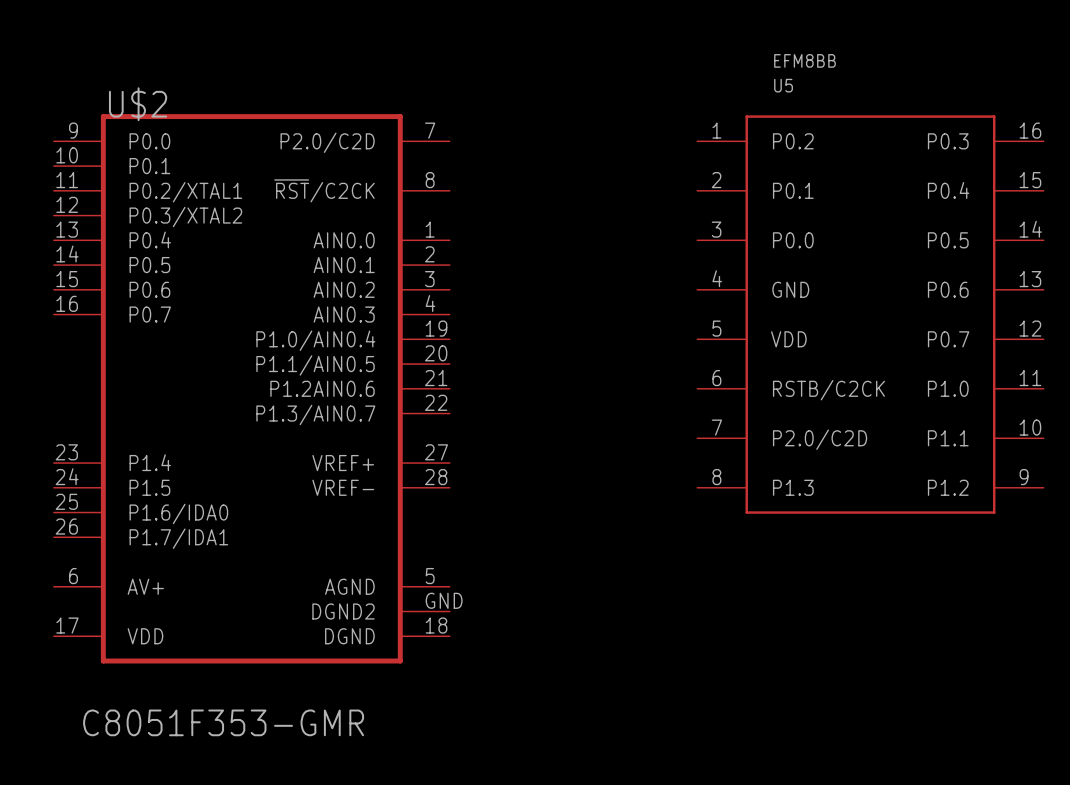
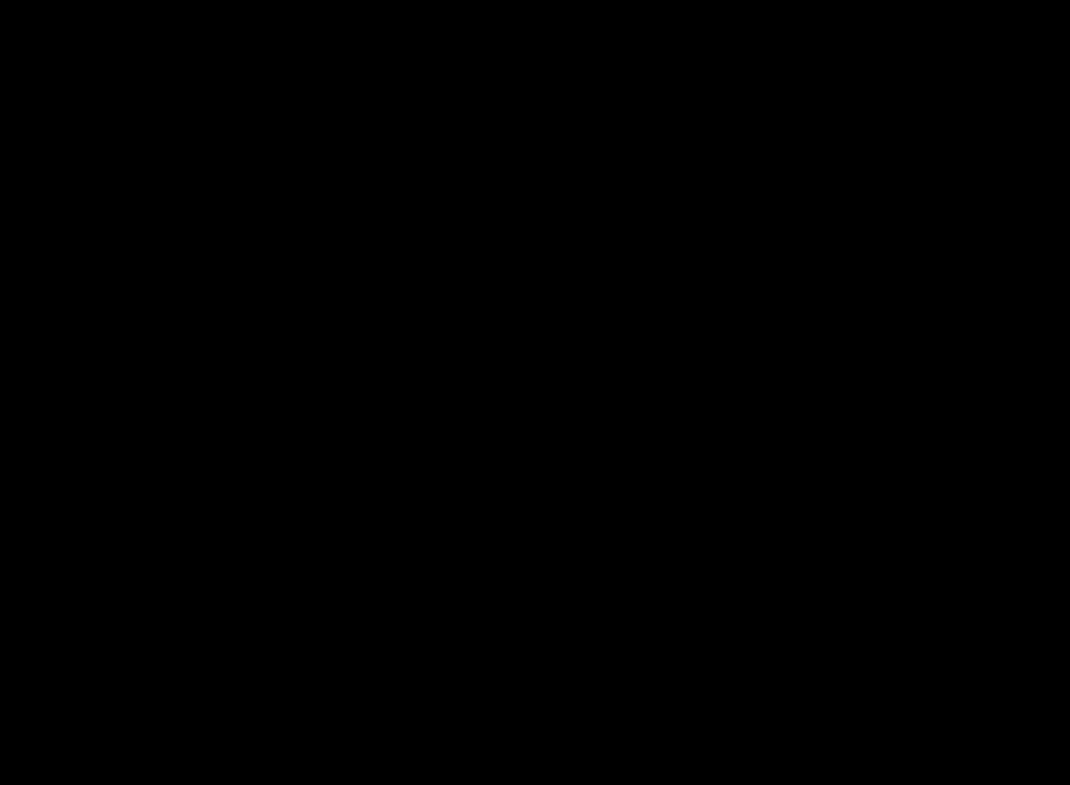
U5: (870, 314) -> none
U$2: (251, 388) -> none

